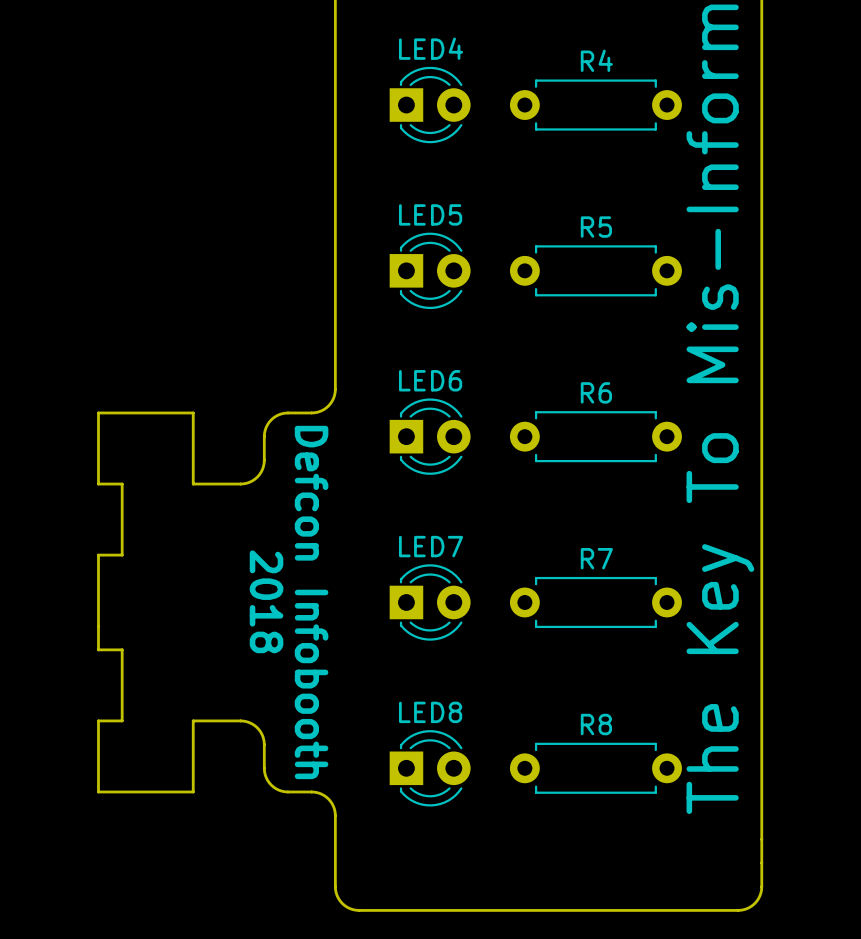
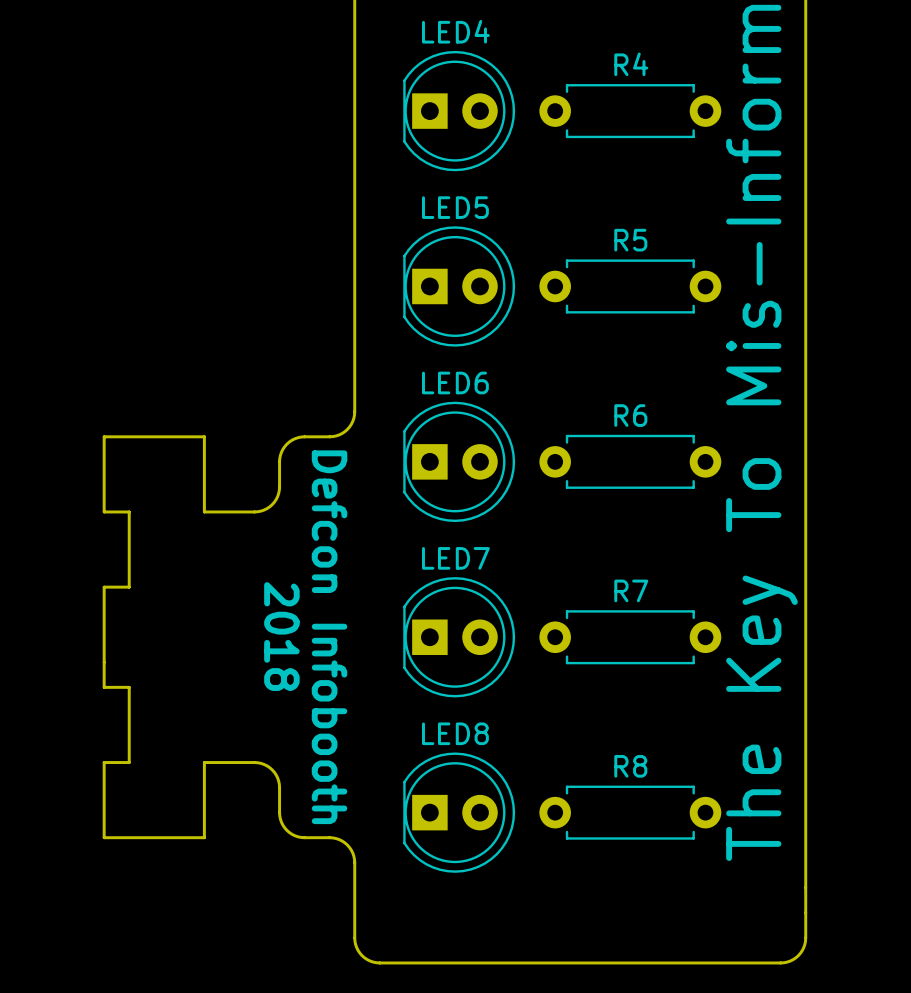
LED4 footprint: [389, 66, 471, 144] -> [403, 50, 516, 172]
LED5 footprint: [389, 232, 471, 310] -> [403, 226, 516, 347]
LED6 footprint: [389, 398, 471, 475] -> [403, 401, 516, 523]
LED7 footprint: [389, 564, 471, 641] -> [403, 577, 516, 698]
LED8 footprint: [389, 730, 471, 807] -> [403, 752, 516, 873]

